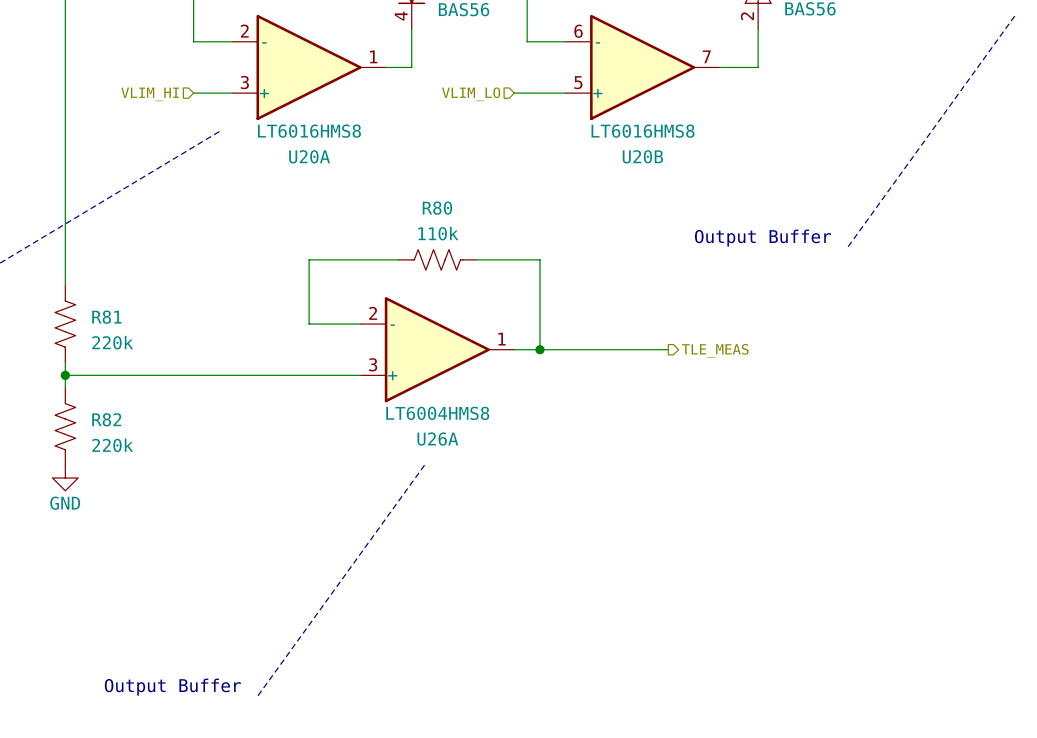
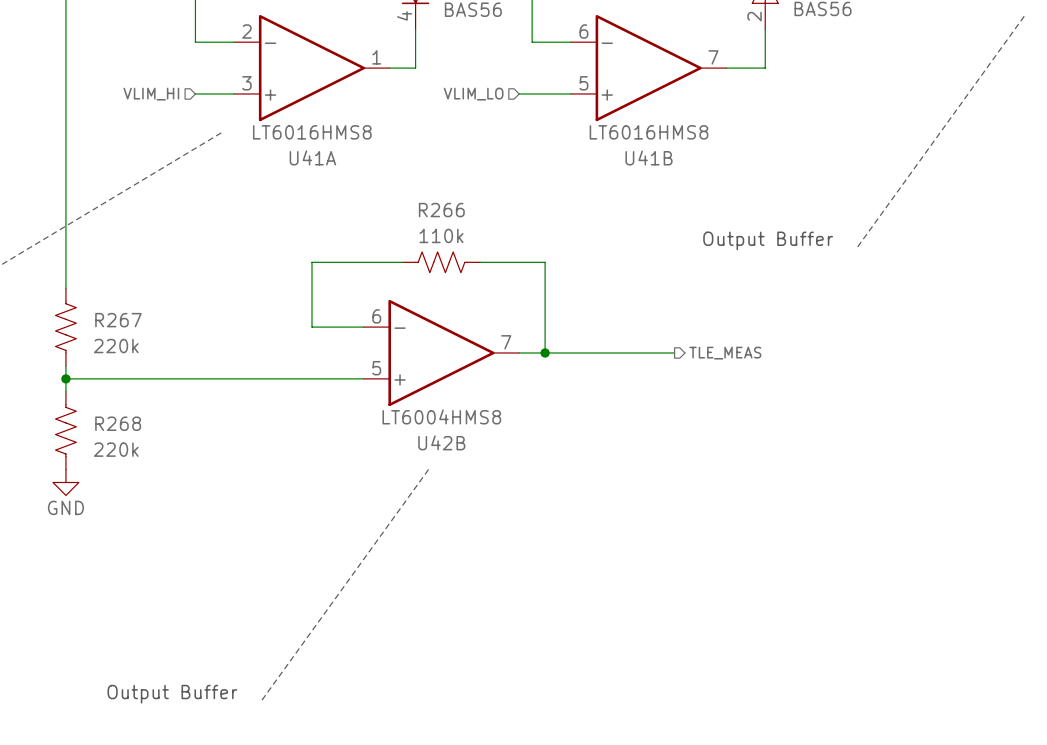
U20A name: U20A (309, 156) -> U41A (312, 157)
U20B name: U20B (642, 156) -> U41B (649, 157)
R80 name: R80 (437, 208) -> R266 (441, 210)
U26A pin number: 2 (373, 313) -> 6 (376, 316)
R81 name: R81 (106, 317) -> R267 (118, 320)
U26A pin number: 1 (501, 339) -> 7 (506, 342)
U26A pin number: 3 (373, 364) -> 5 (376, 368)
R82 name: R82 (106, 419) -> R268 (118, 423)
U26A name: U26A (437, 439) -> U42B (441, 442)

